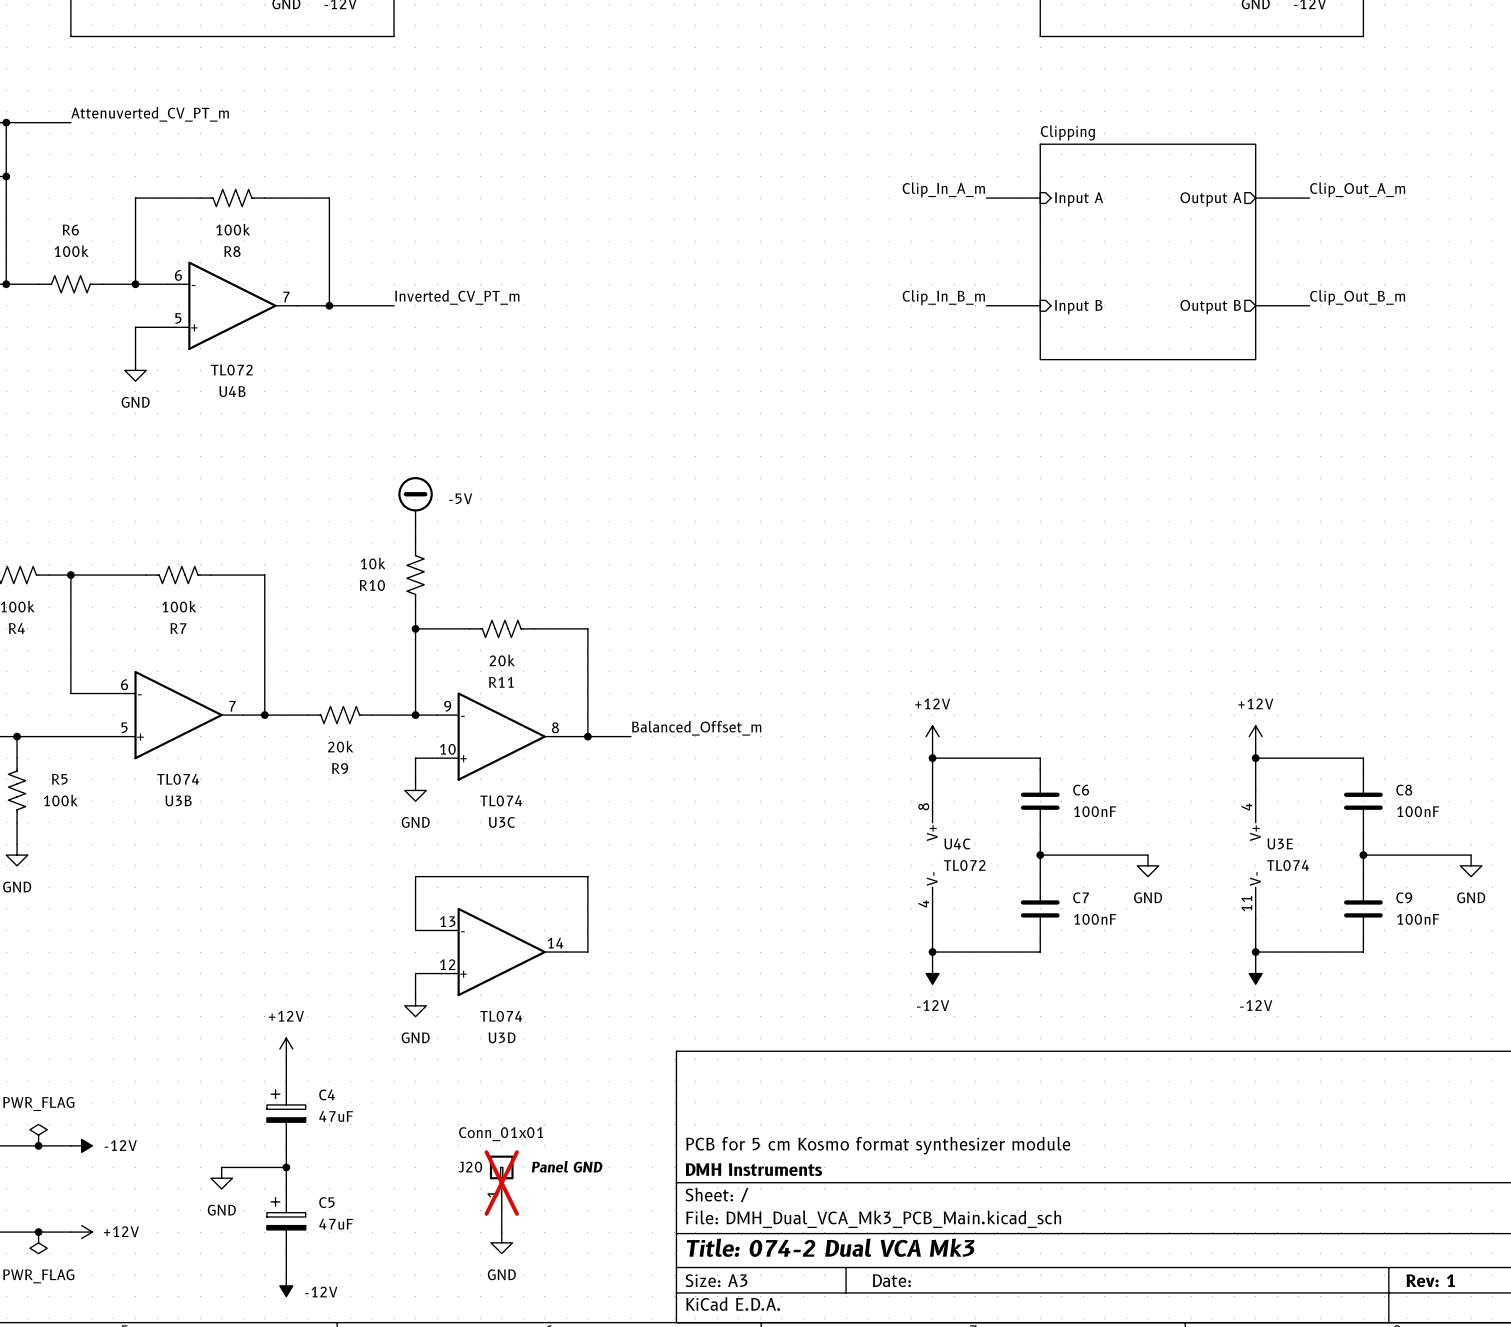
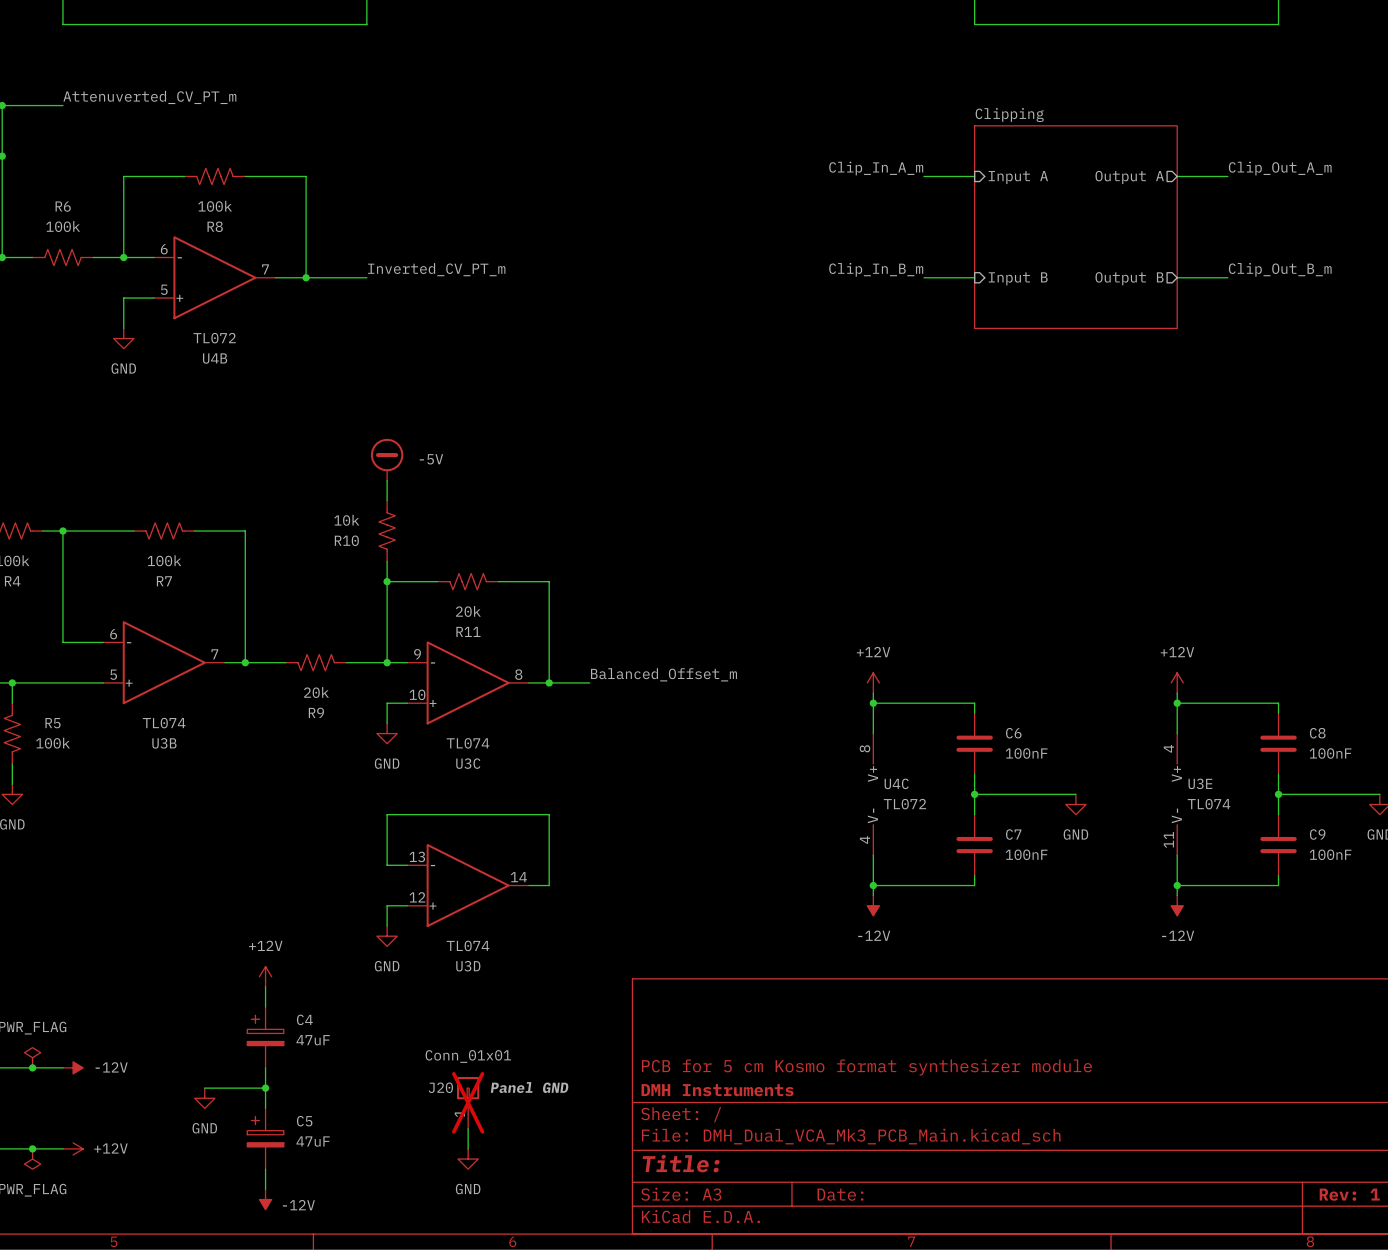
title block: Title: 074-2 Dual VCA Mk3 (830, 1247) -> Title: (681, 1163)

